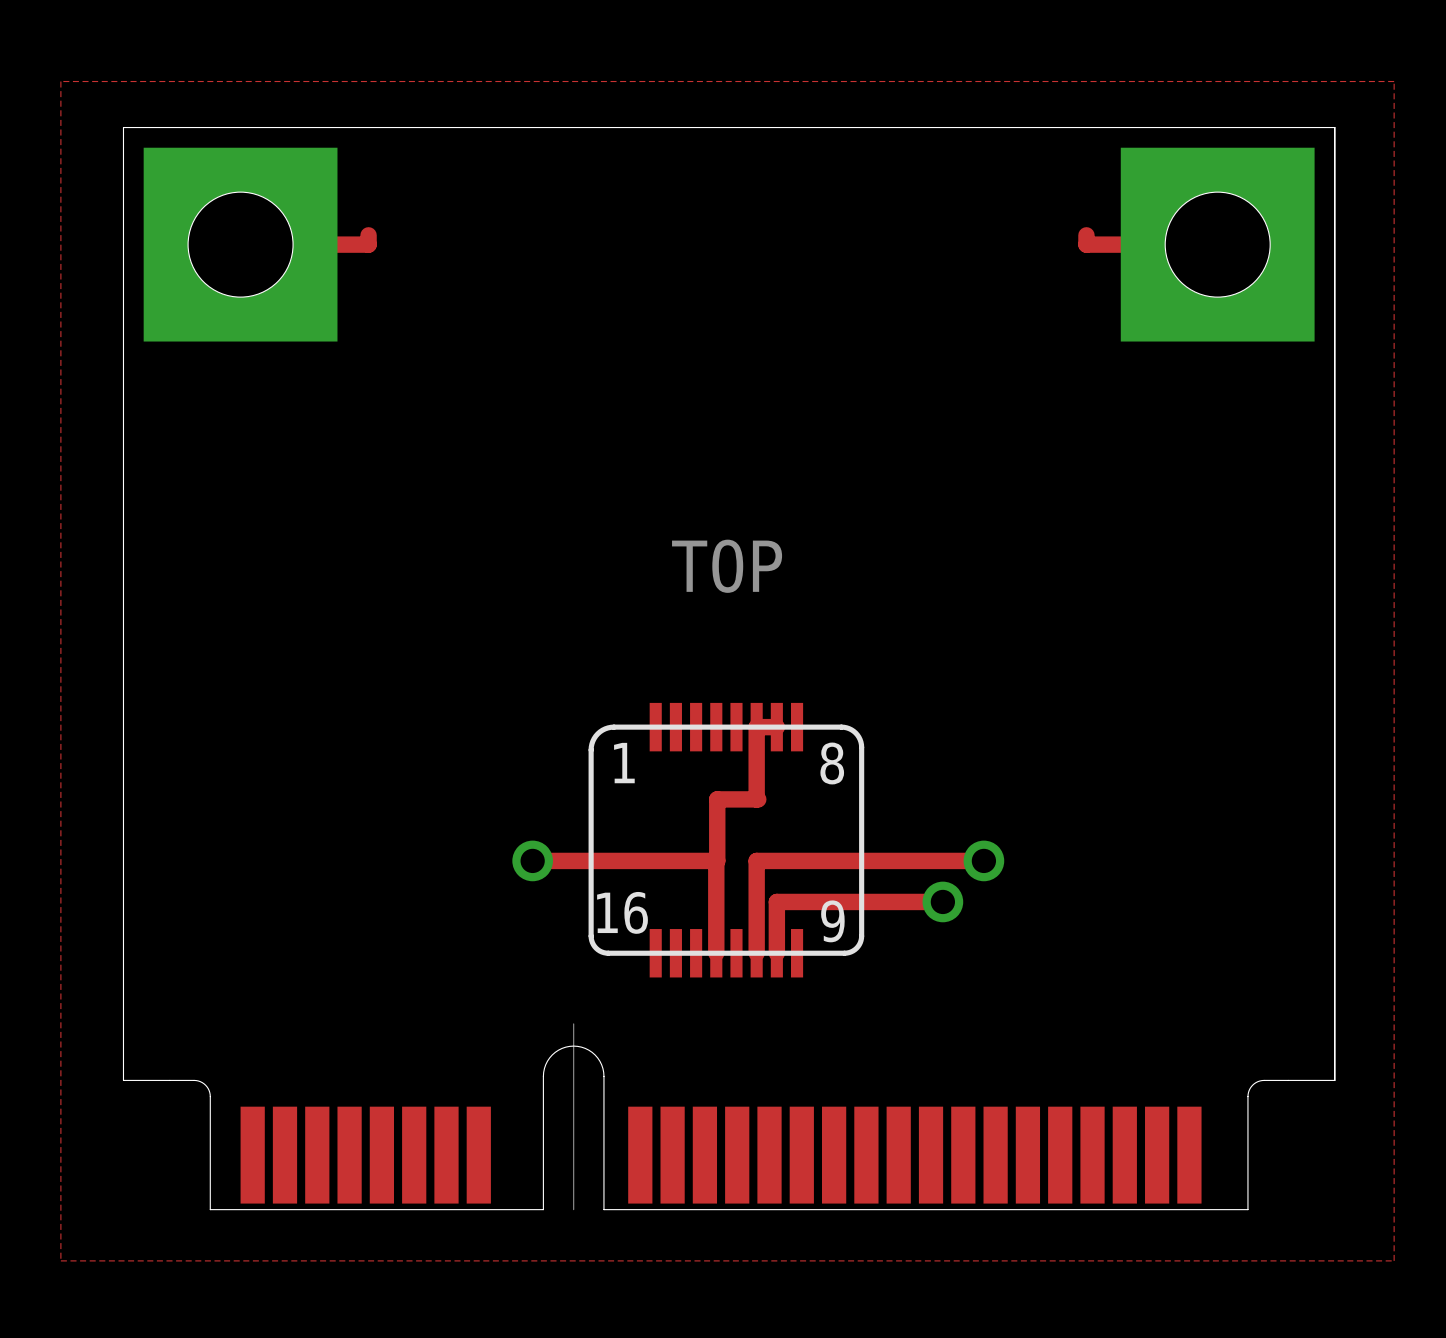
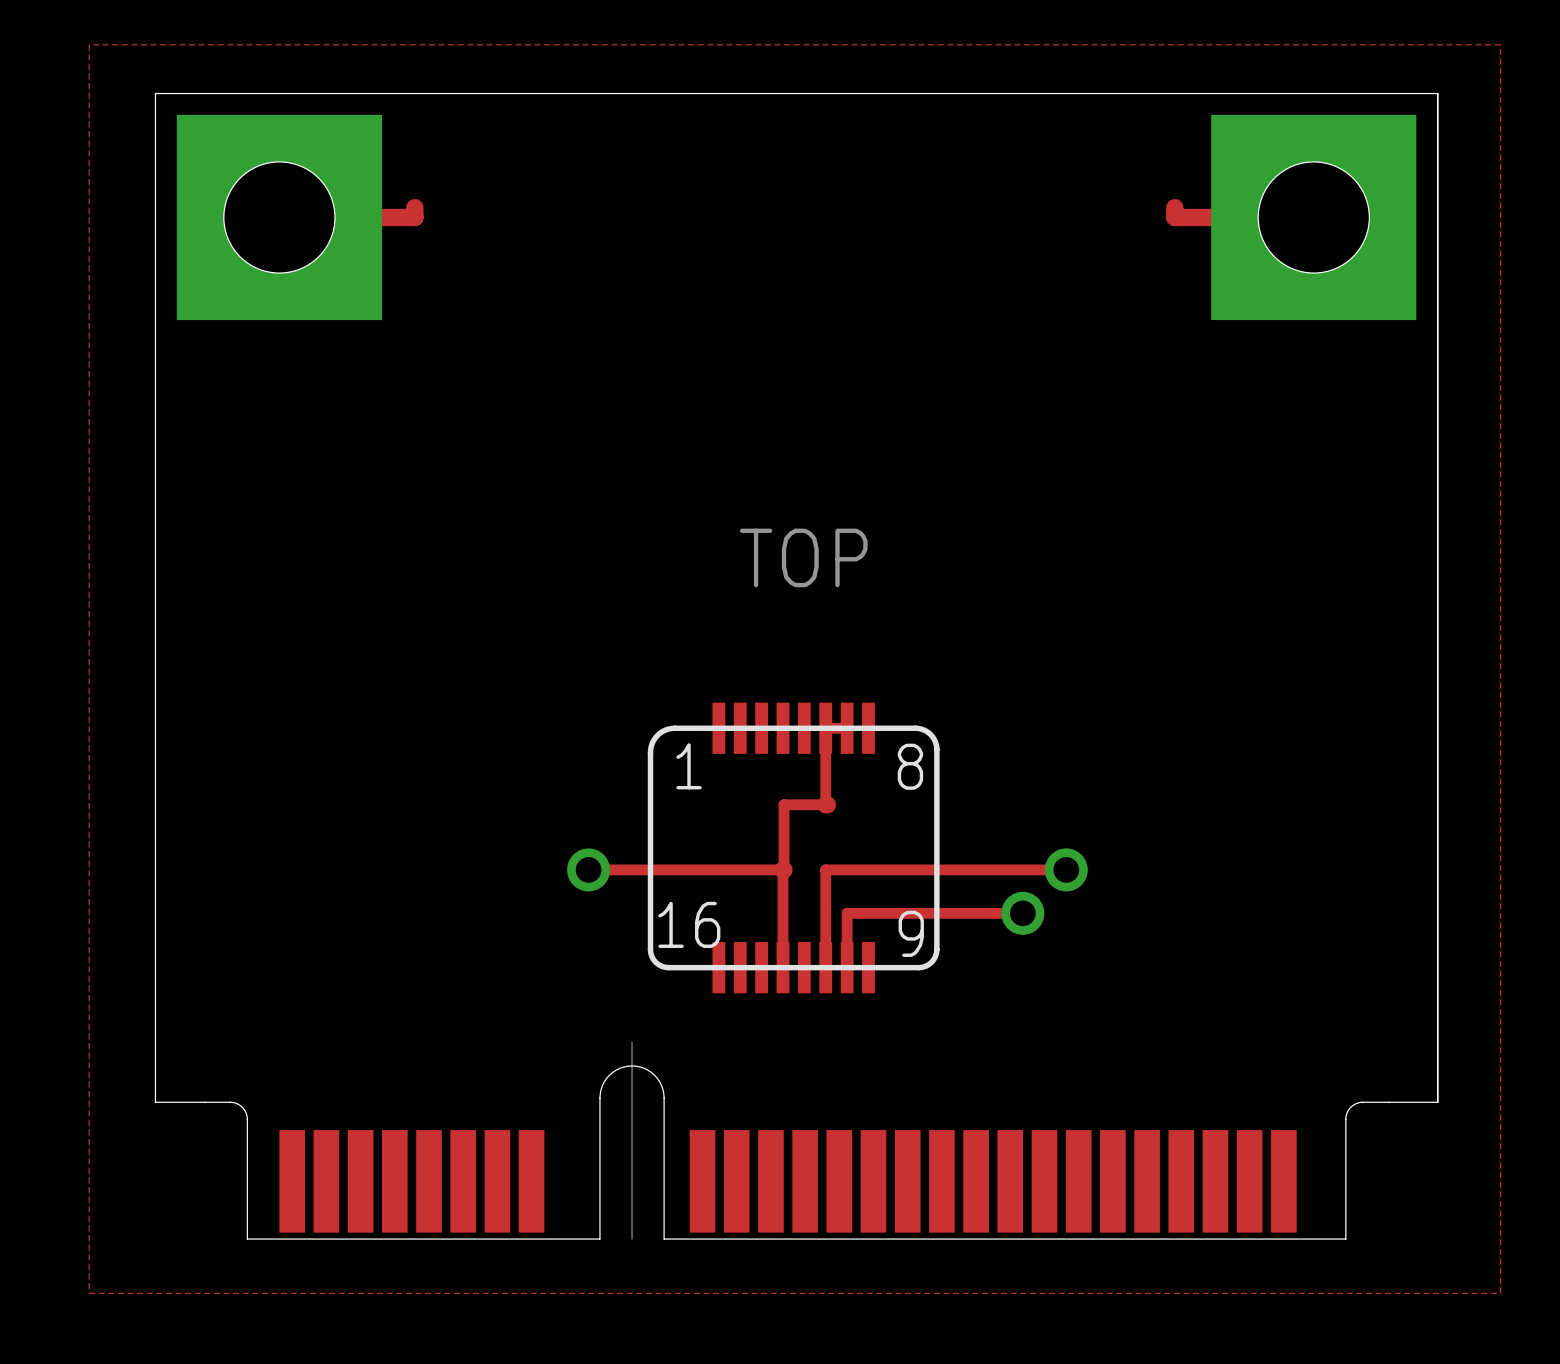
track width: thick (776, 727) (756, 727) (756, 799) (717, 799) (717, 860) -> thin (847, 728) (825, 728) (825, 804) (784, 804) (784, 869)
track width: thick (532, 860) (716, 860) (716, 953) -> thin (588, 869) (783, 869) (783, 967)
track width: thick (983, 860) (756, 860) (756, 953) -> thin (1066, 869) (825, 869) (825, 967)
track width: thick (942, 901) (776, 901) (776, 953) -> thin (1022, 913) (847, 913) (847, 967)

